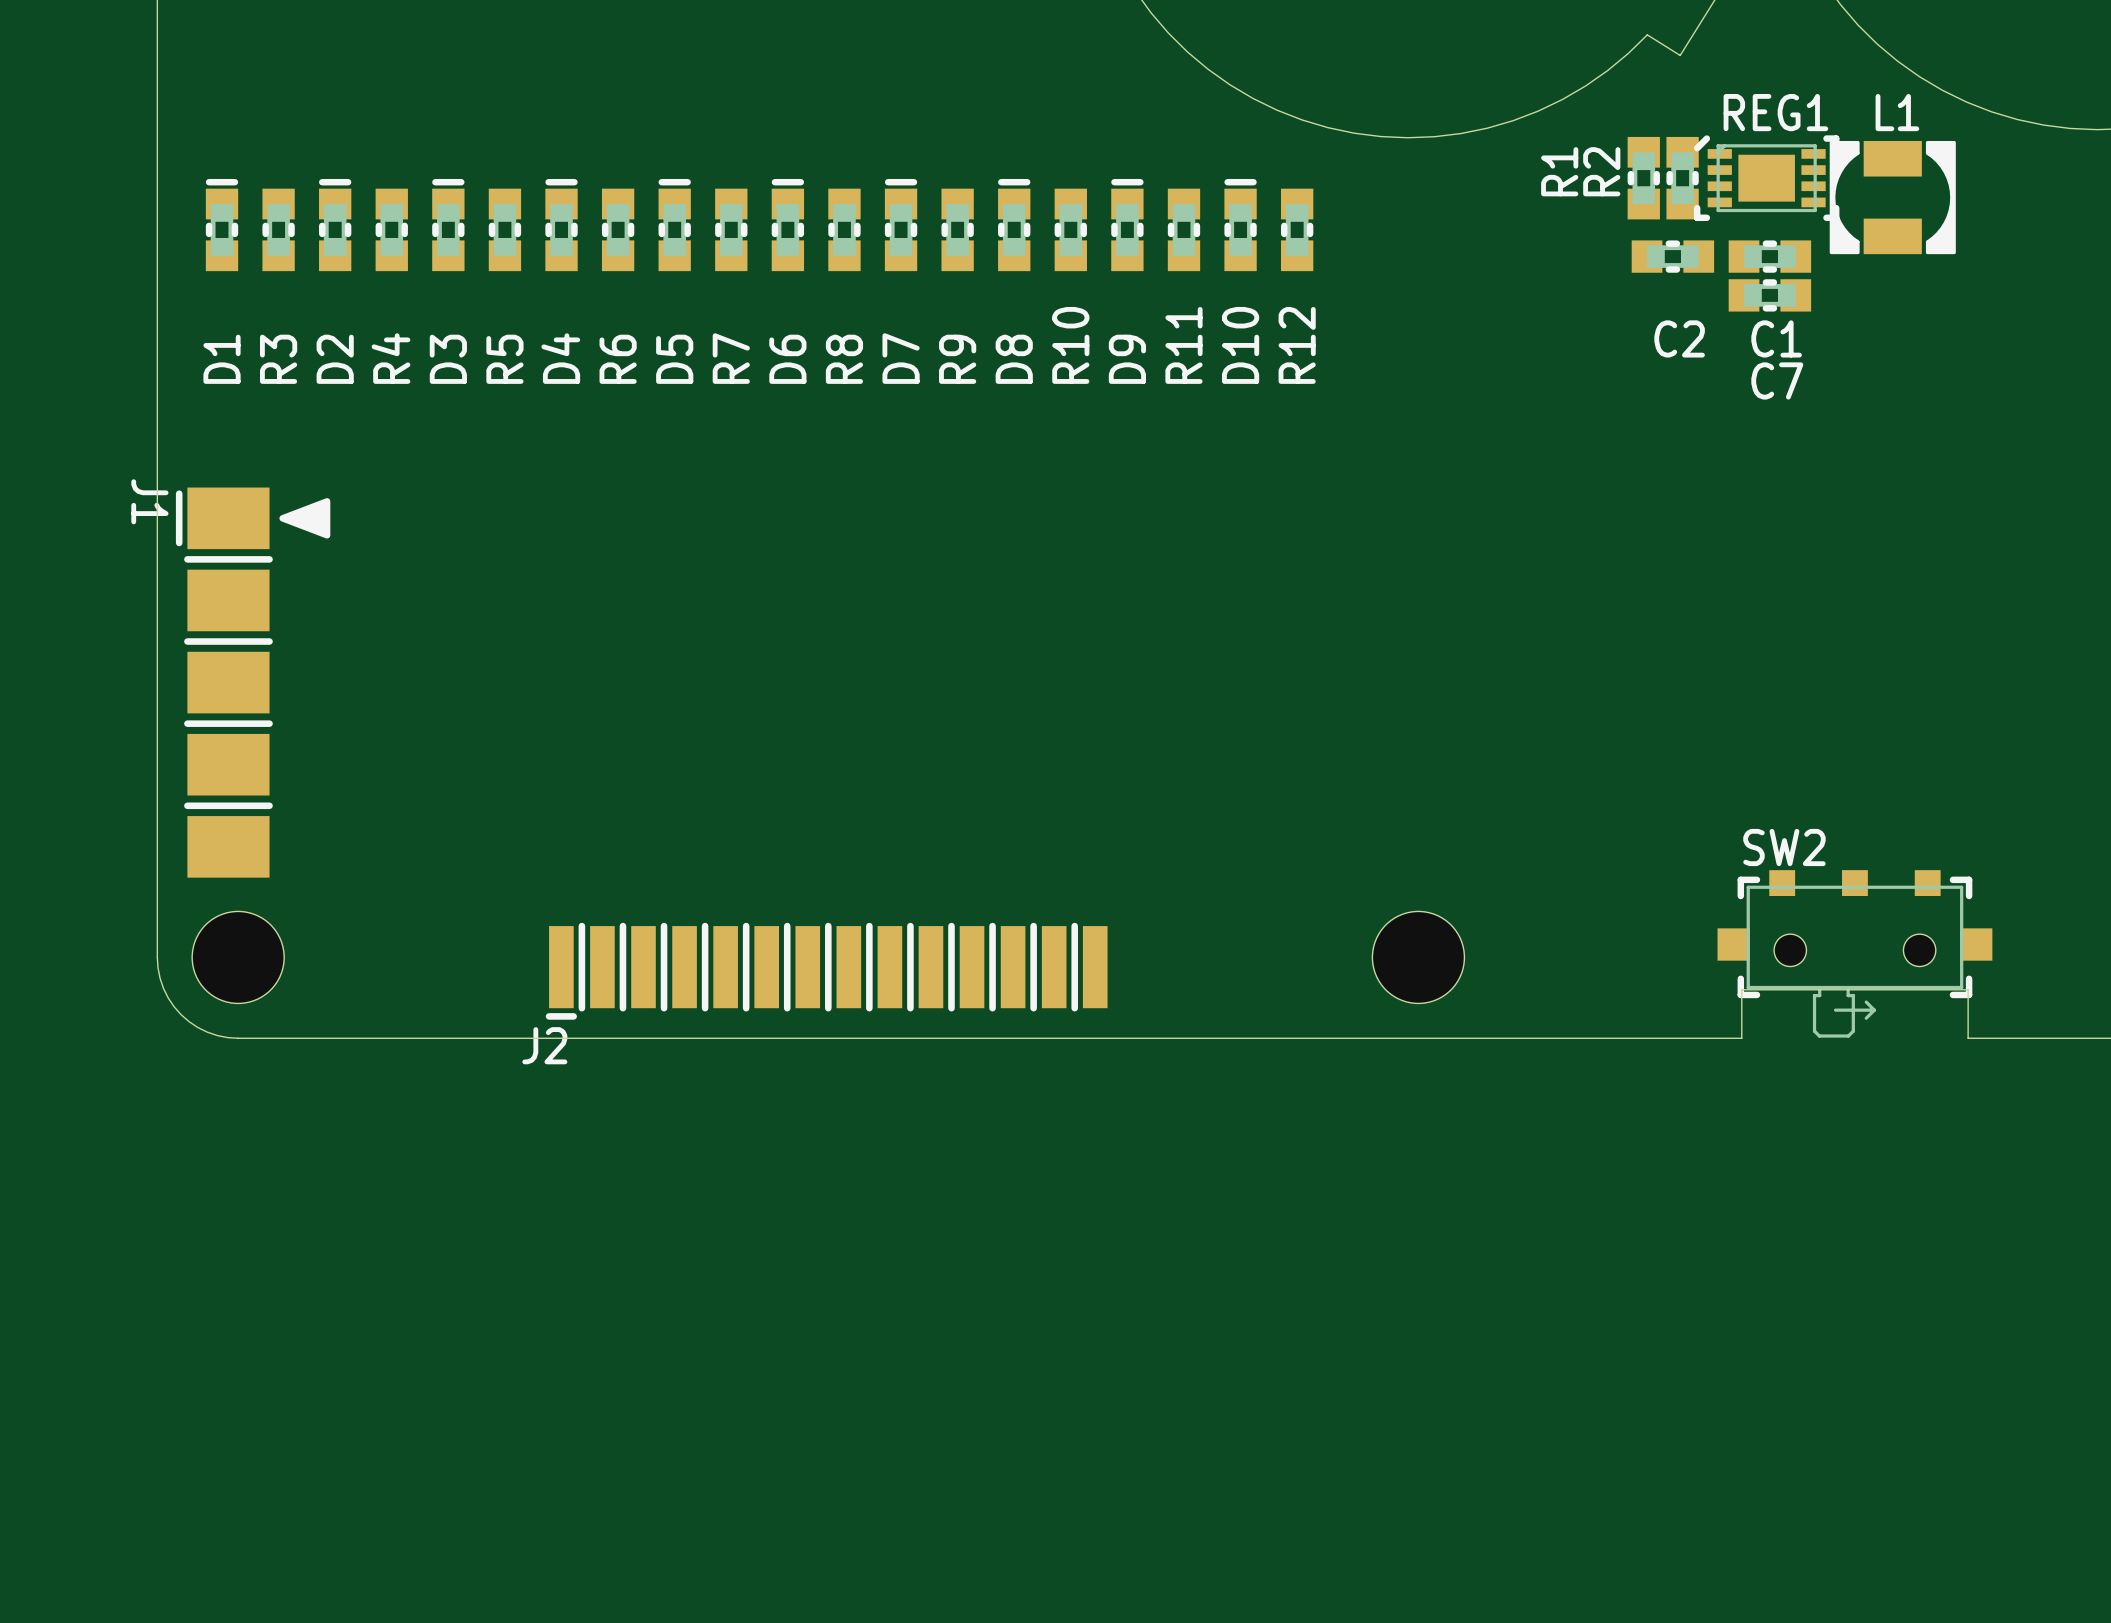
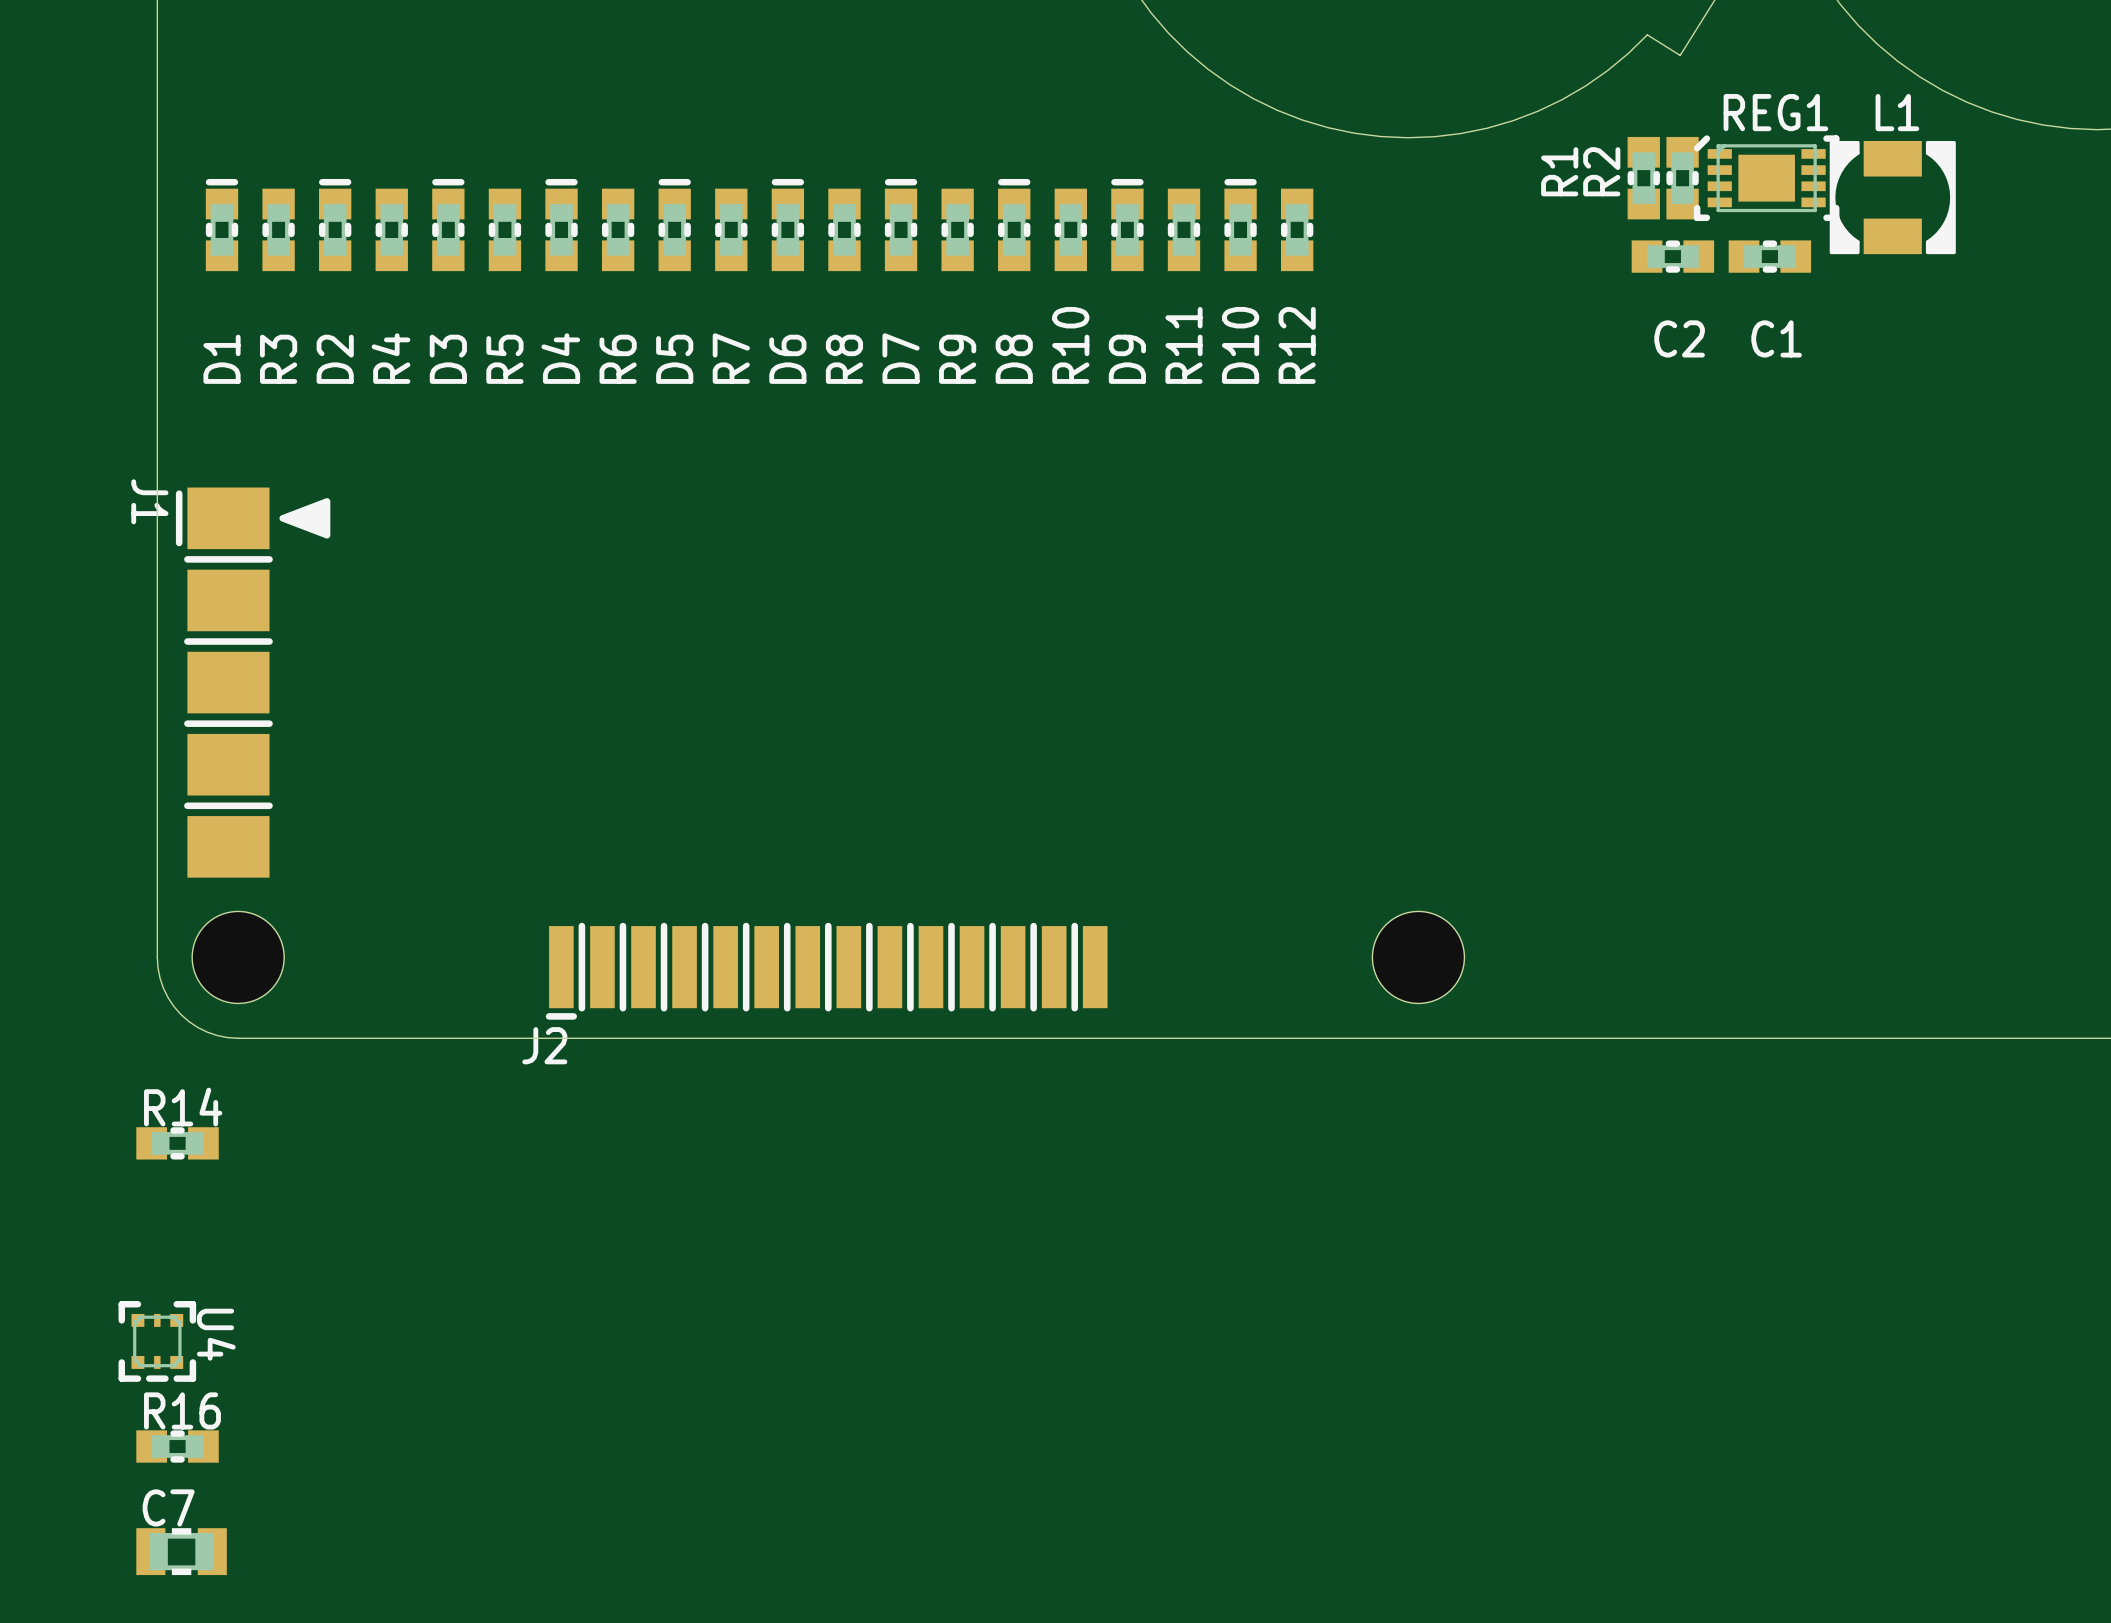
C7 footprint: [1728, 279, 1812, 312] -> [136, 1528, 227, 1576]
C7 name position: C7 (1777, 380) -> C7 (168, 1507)
SW2: (1854, 953) -> none
board edge: (1741, 1038) (1741, 989) (1968, 989) (1968, 1038) -> (1741, 1038) (1968, 1038)
R14: none -> (177, 1143)
U4: none -> (157, 1341)
R16: none -> (177, 1446)

